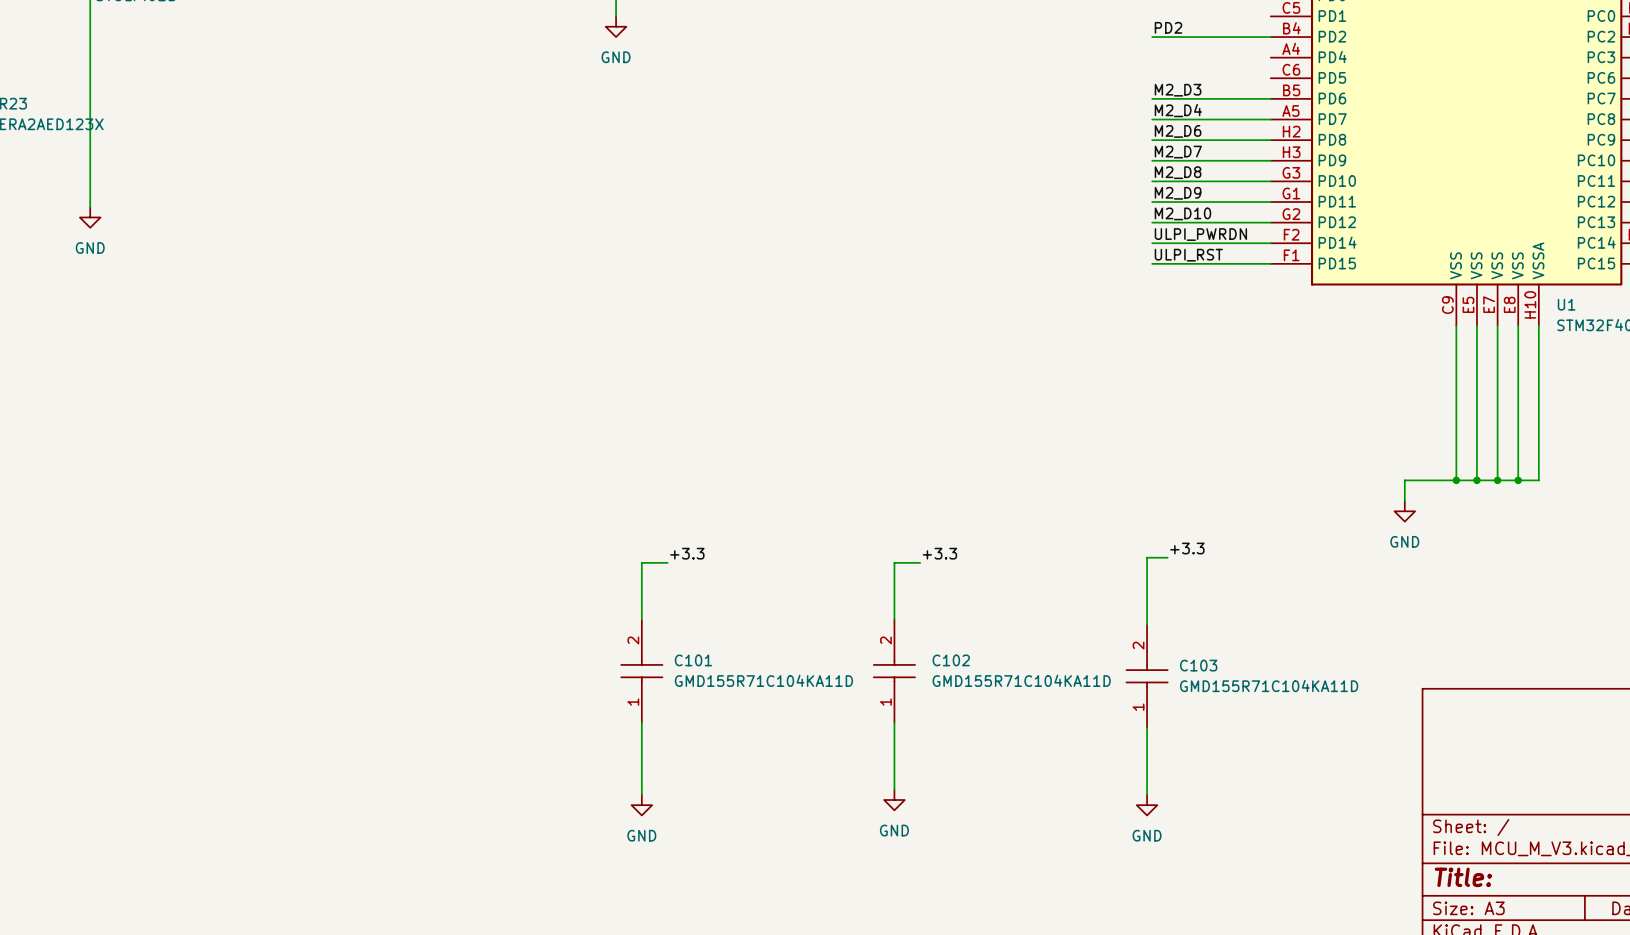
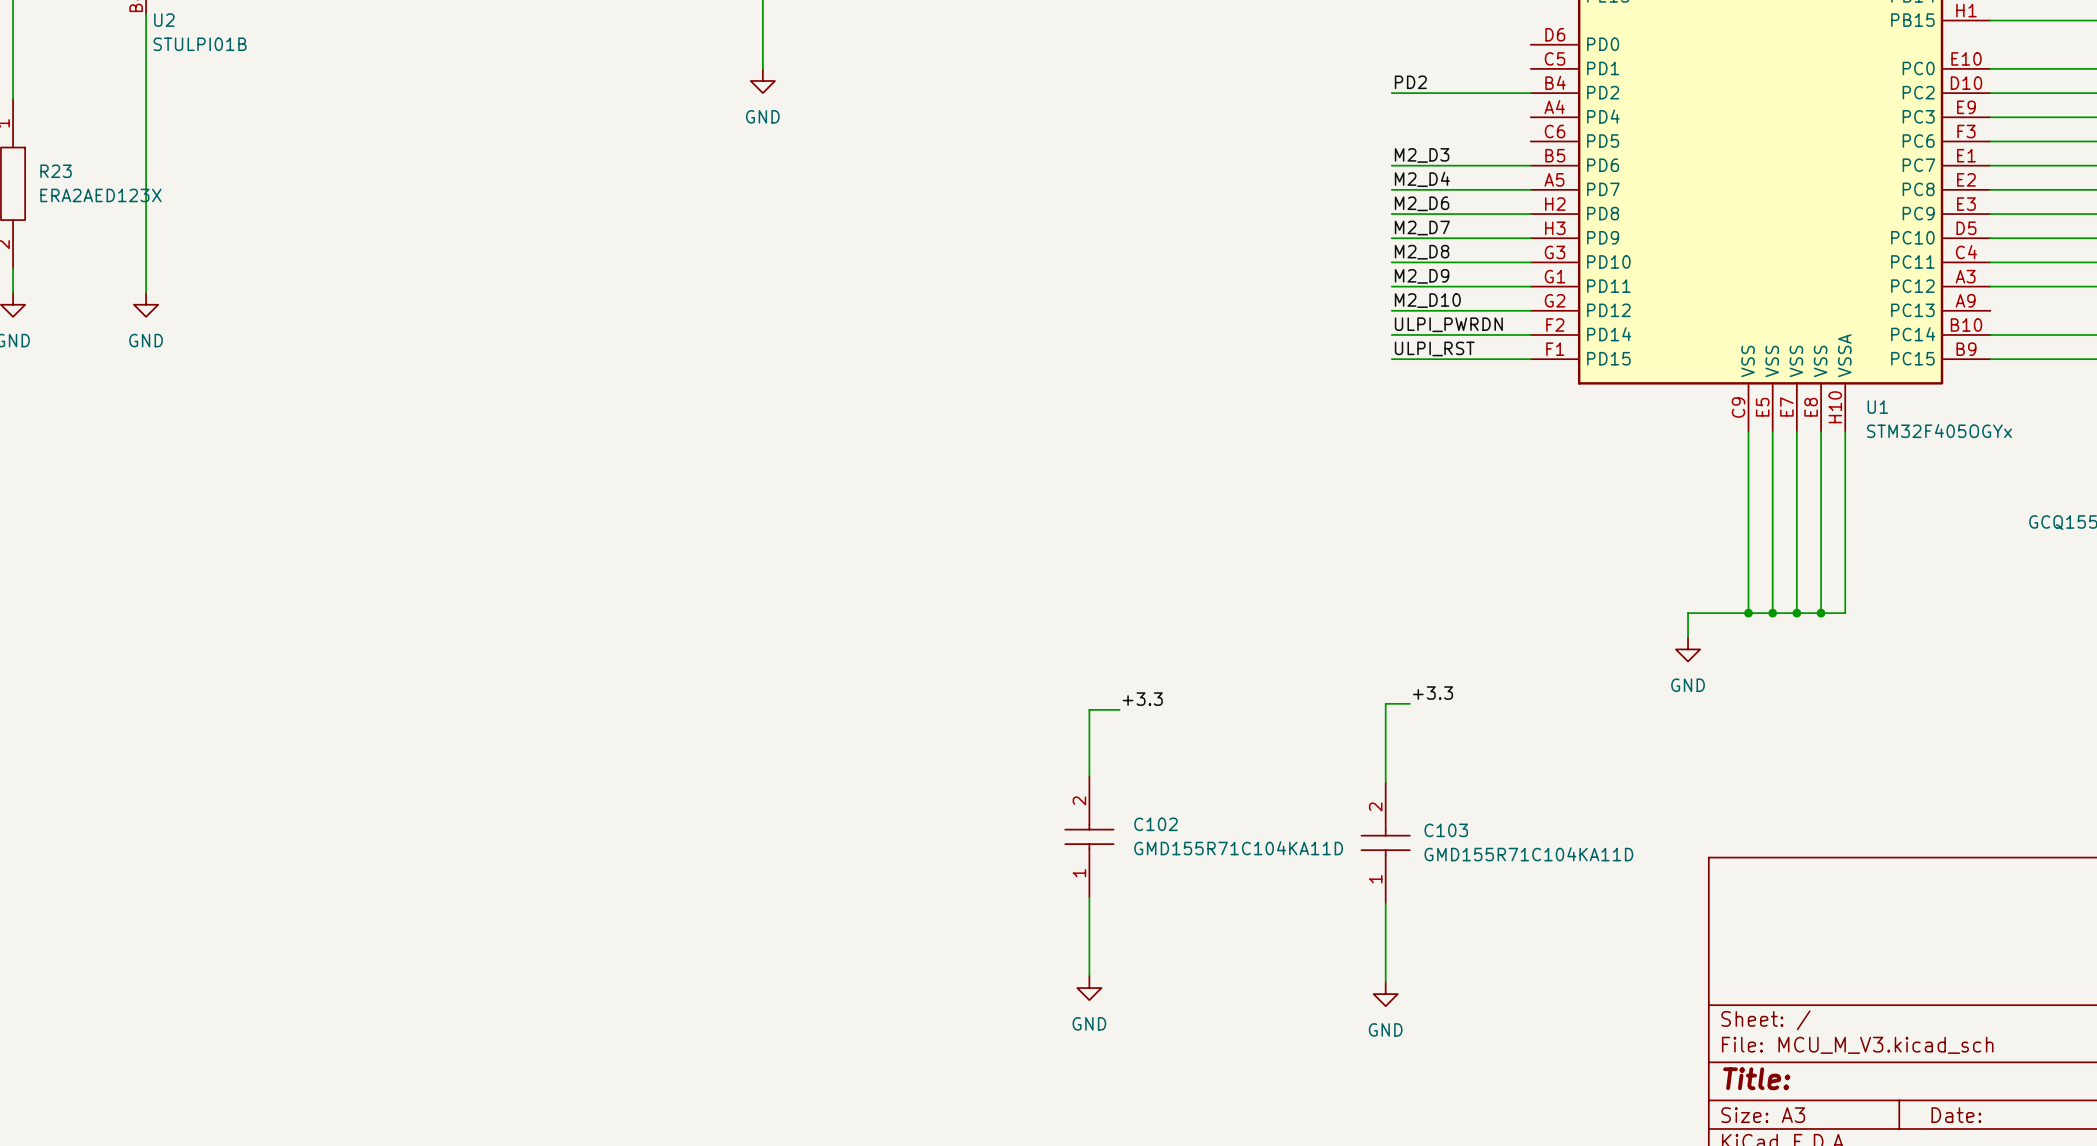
label: +3.3 (687, 553) -> none
wire: (667, 562) (641, 562) (641, 619) -> none
C101: GMD155R71C104KA11D (641, 671) -> none
wire: (641, 722) (641, 794) -> none
power symbol: GND (641, 805) -> none

